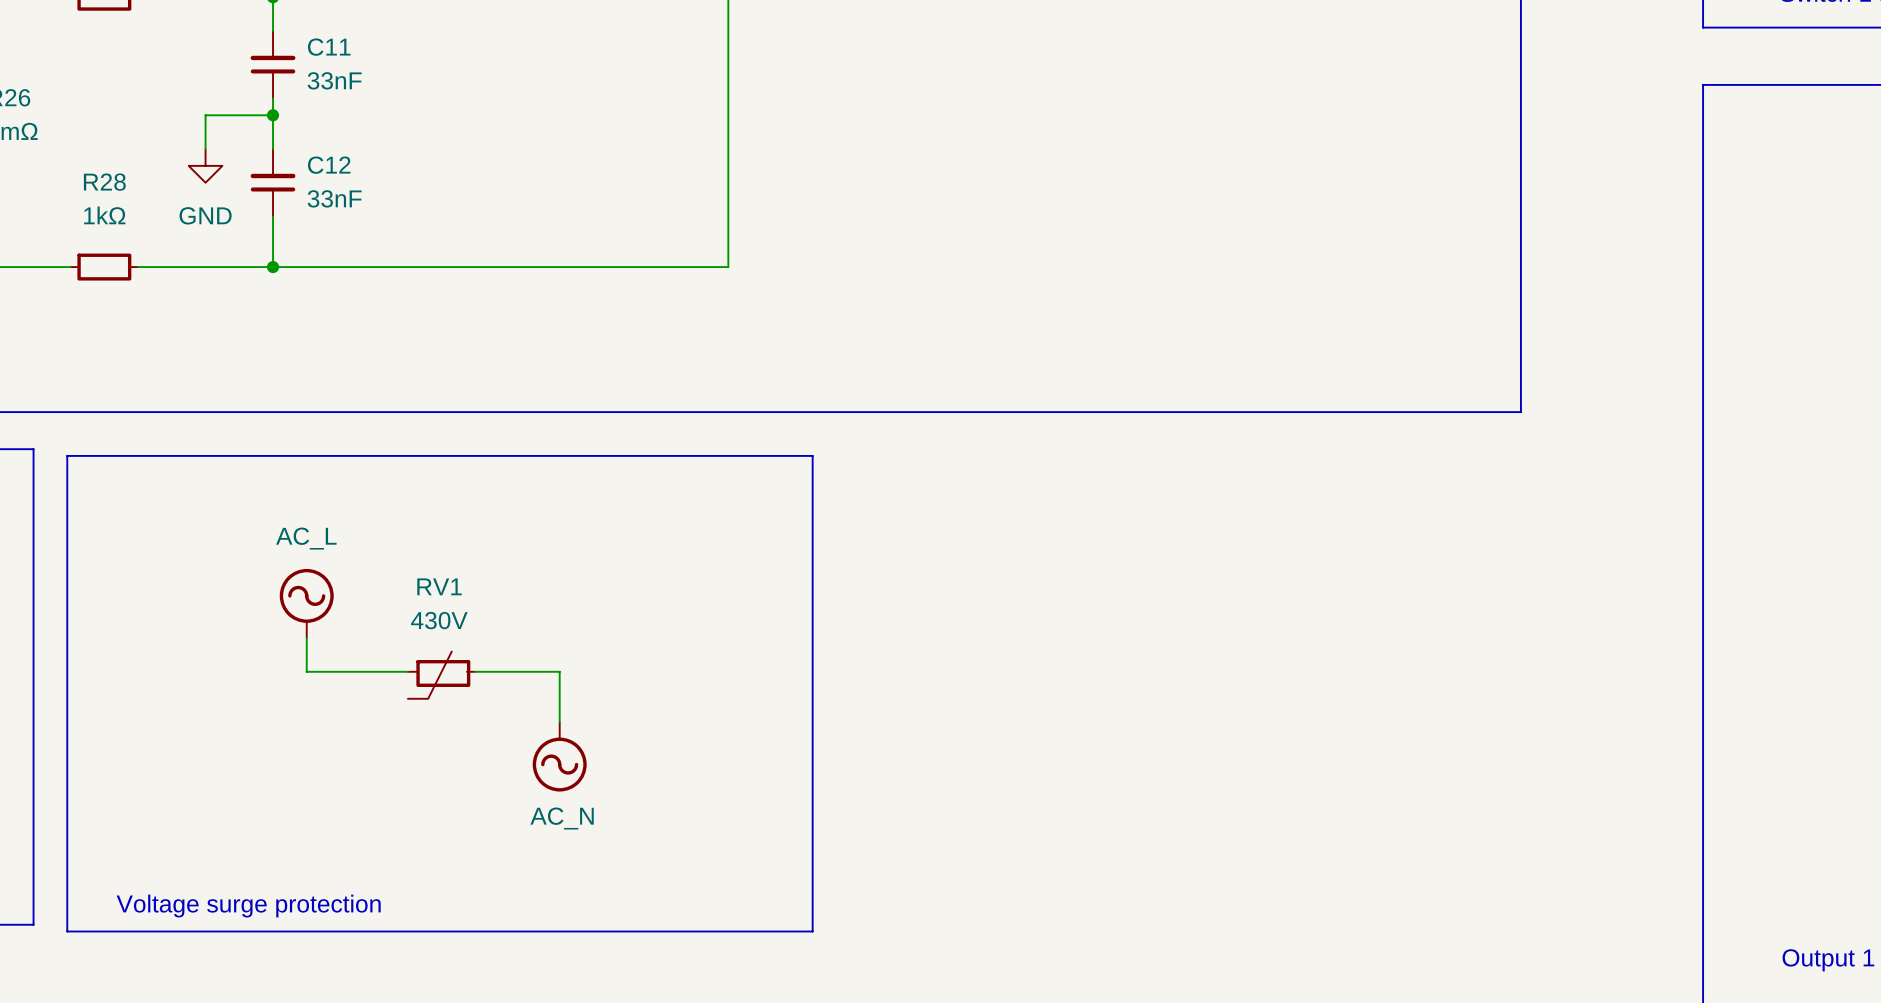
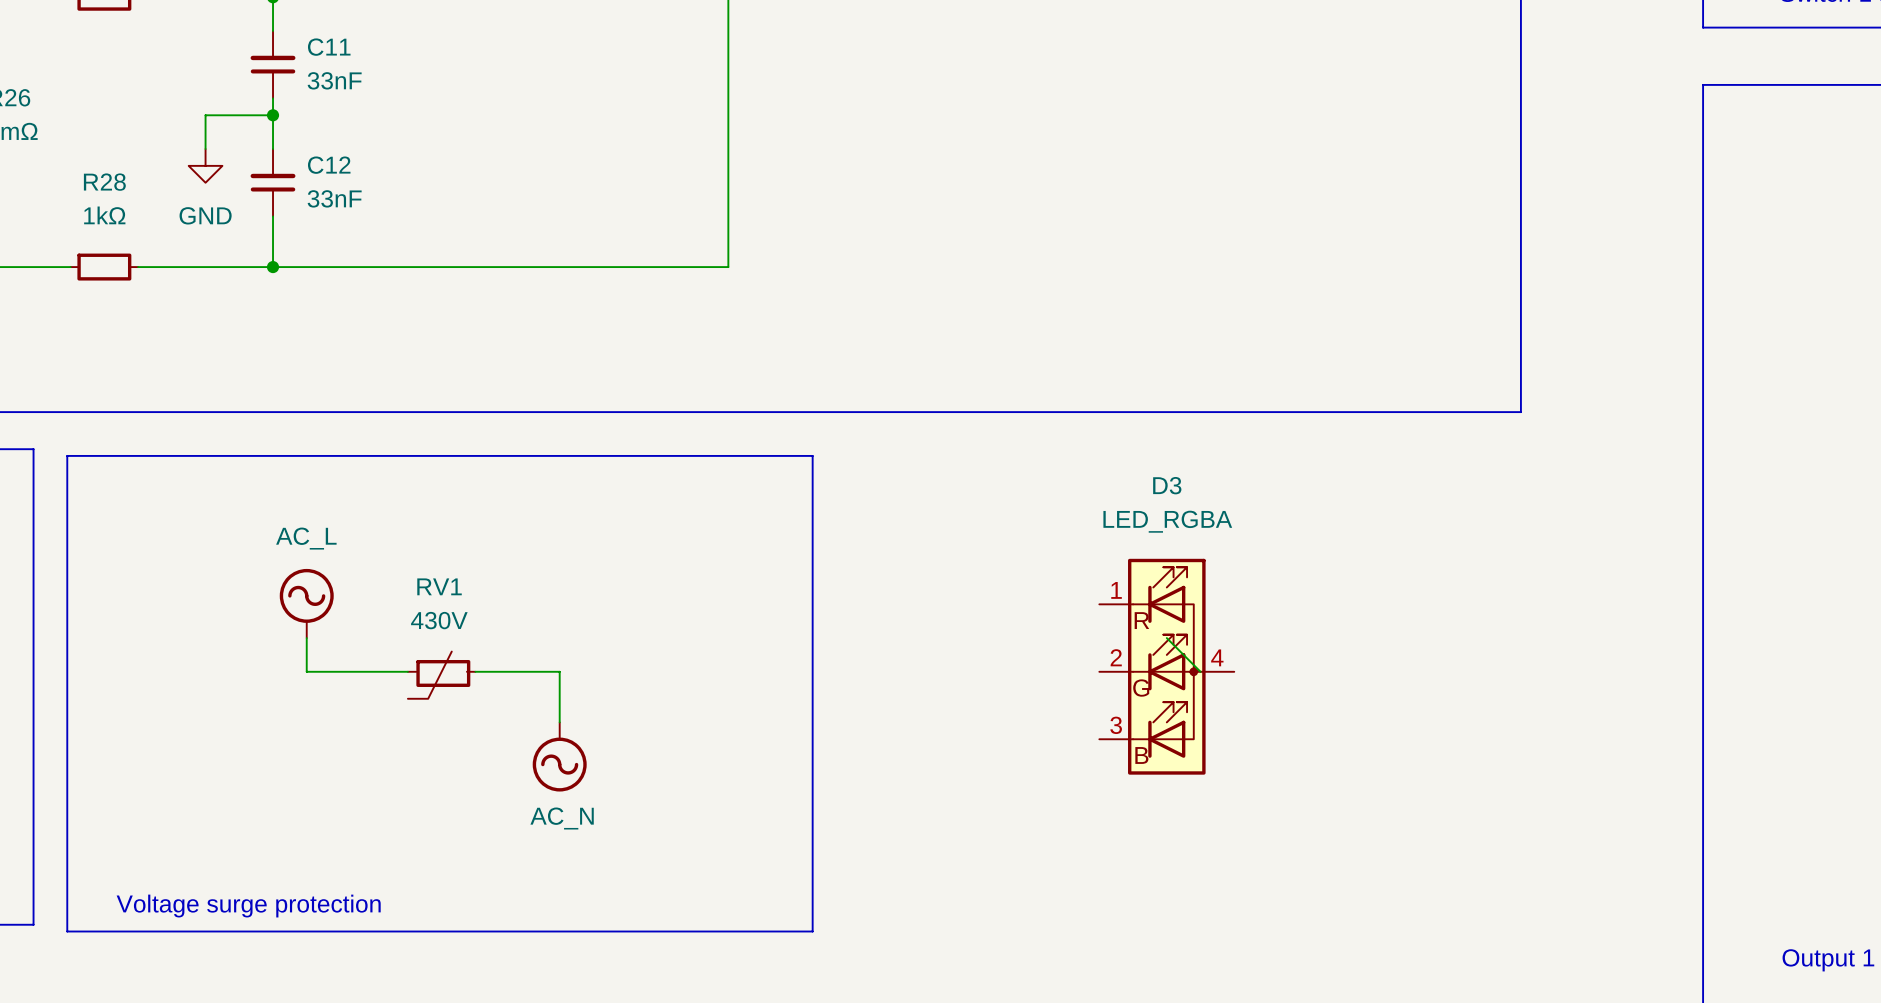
wire: none -> (1166, 638) (1200, 671)
D3: none -> LED_RGBA (1166, 666)

